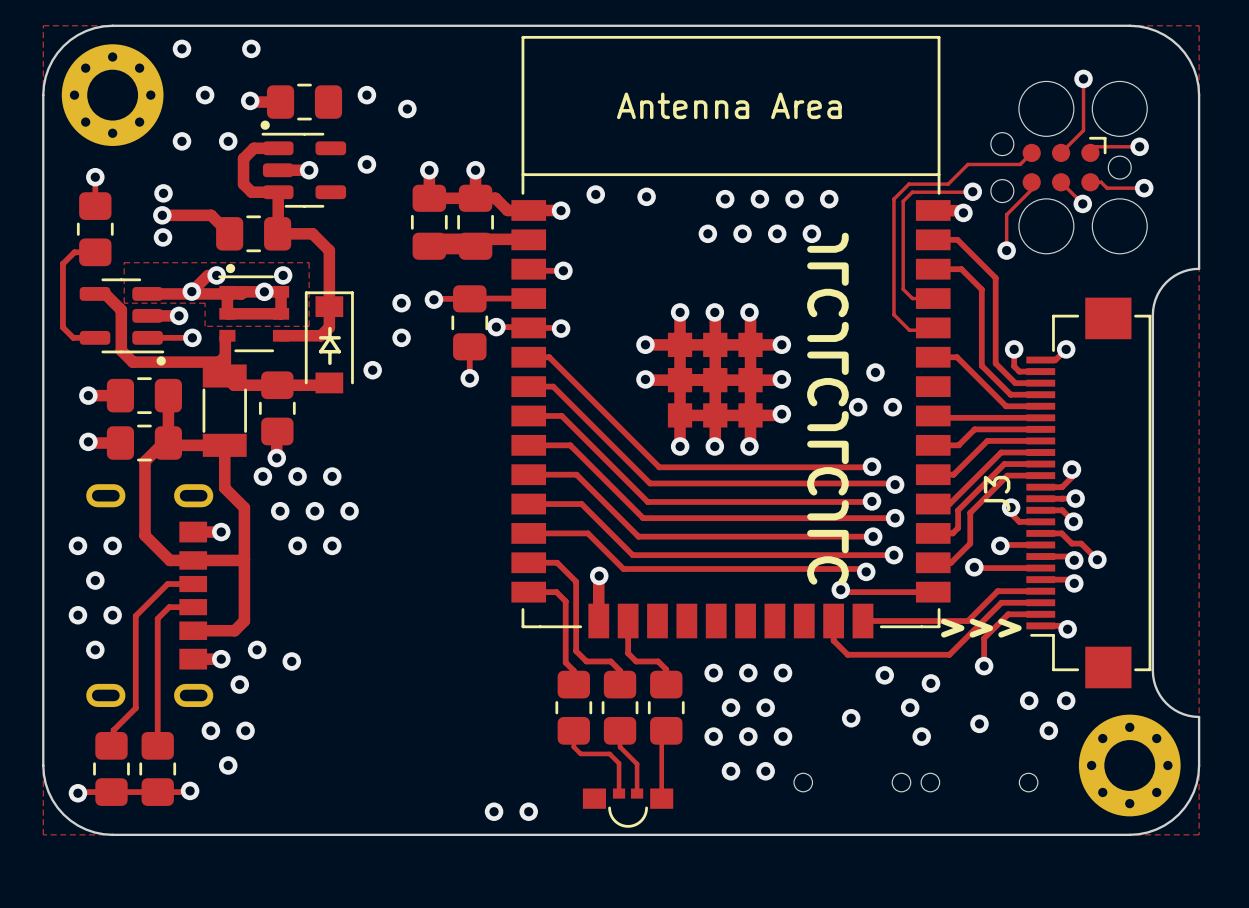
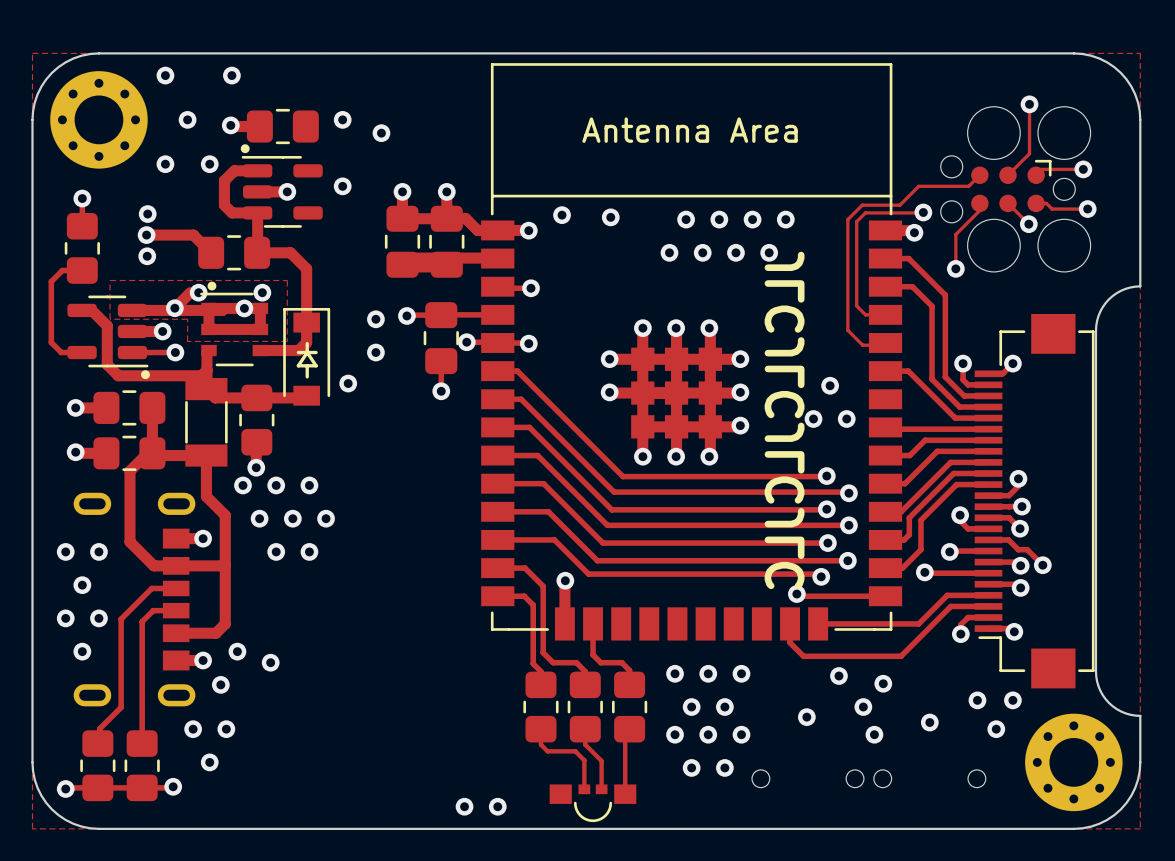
J3 name: J3 (997, 493) -> none
track: (1019, 614) (1008, 614) (984, 638) (984, 666) -> (968, 617) (960, 624) (960, 634)
J3 text: >>> (981, 628) -> none
via position: (984, 666) -> (960, 634)

